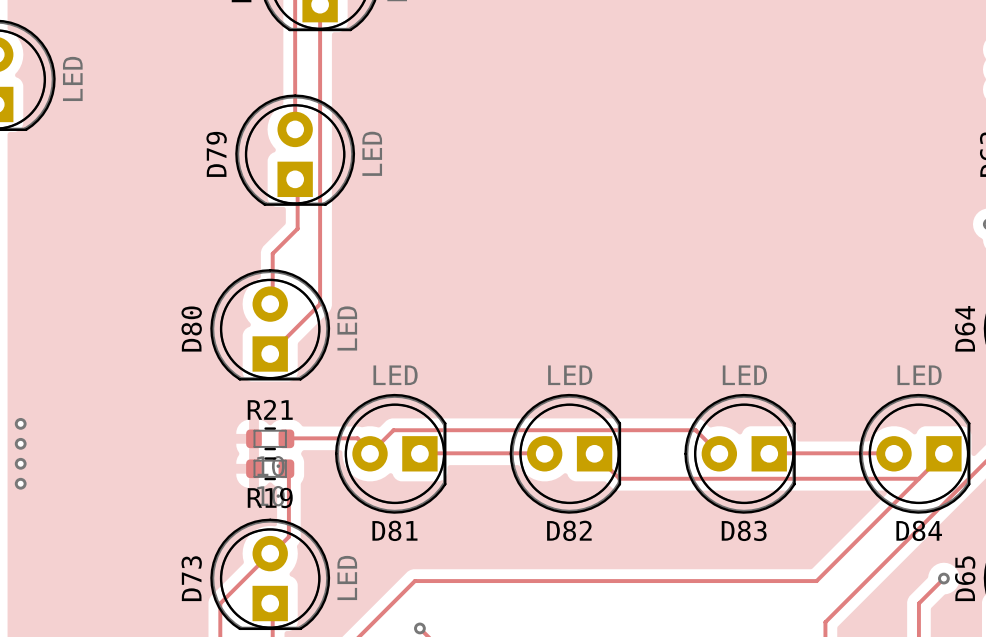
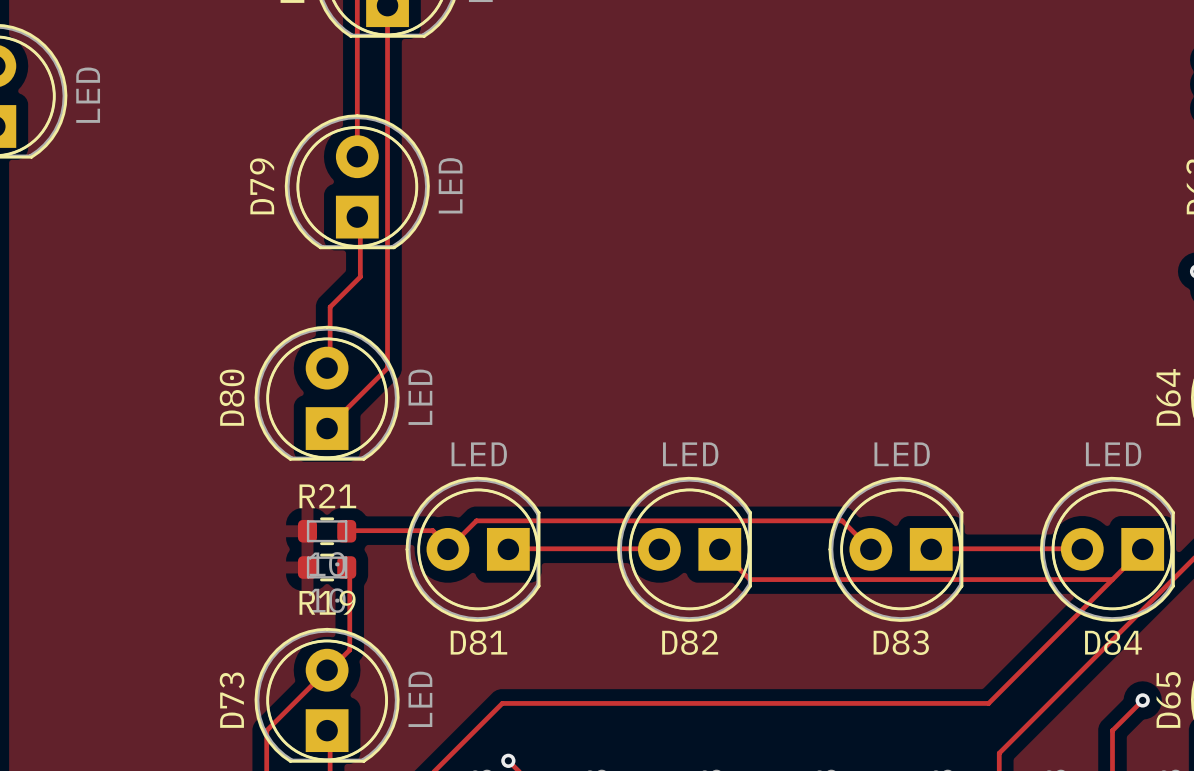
via: (20, 423) -> none
via: (20, 443) -> none
via: (20, 463) -> none
via: (20, 483) -> none

